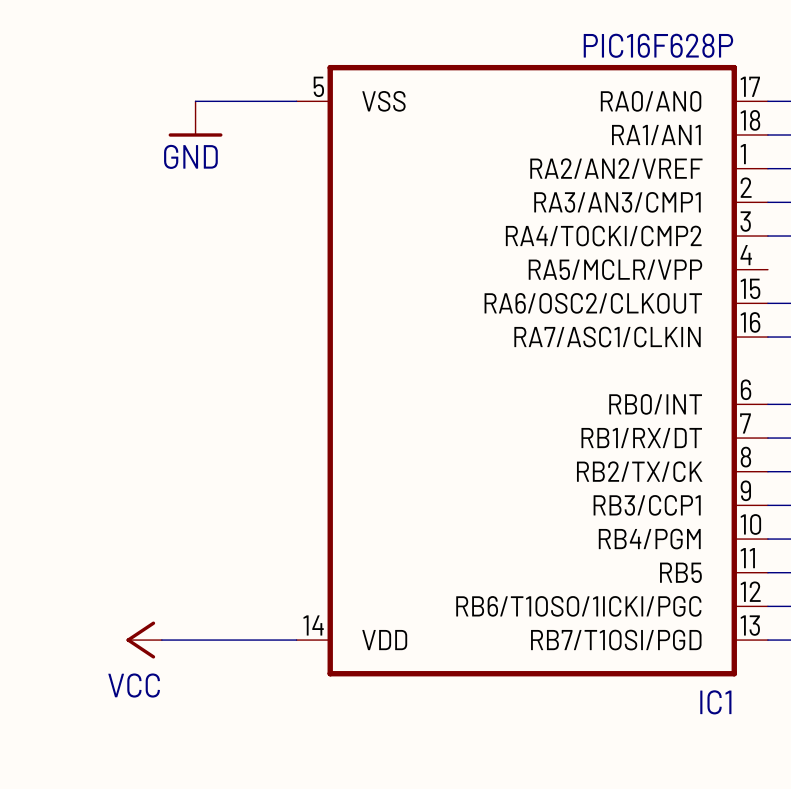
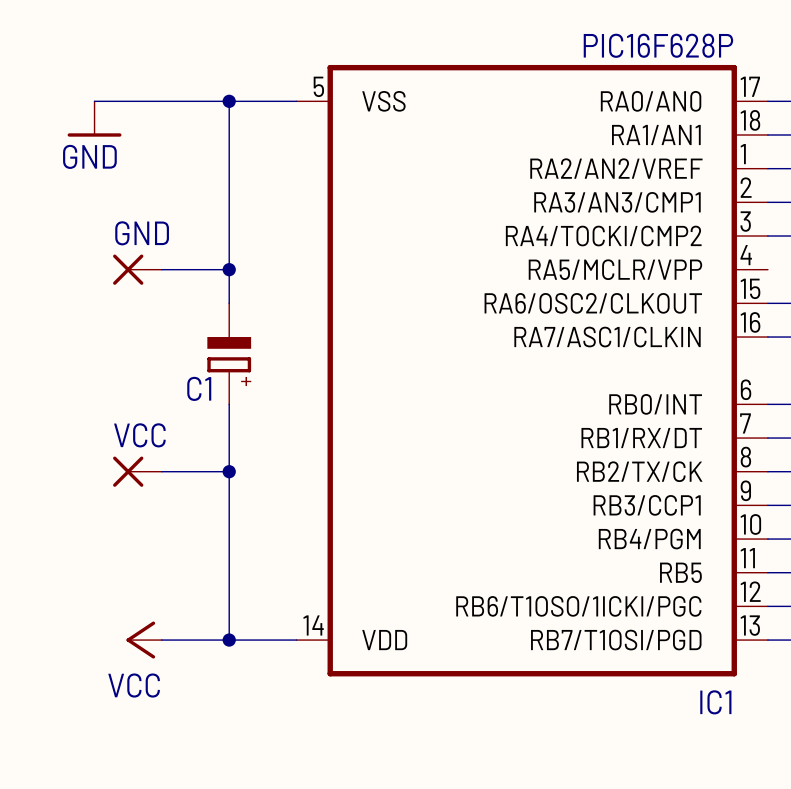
wire: none -> (94, 101) (195, 101)
wire: none -> (229, 101) (229, 303)
junction: none -> (229, 101)
power symbol position: GND (195, 119) -> GND (94, 119)
GND: none -> (137, 269)
wire: none -> (161, 269) (229, 269)
junction: none -> (229, 269)
C1: none -> (229, 353)
wire: none -> (229, 404) (229, 640)
VCC: none -> (137, 471)
wire: none -> (161, 471) (229, 471)
junction: none -> (229, 471)
junction: none -> (229, 640)

